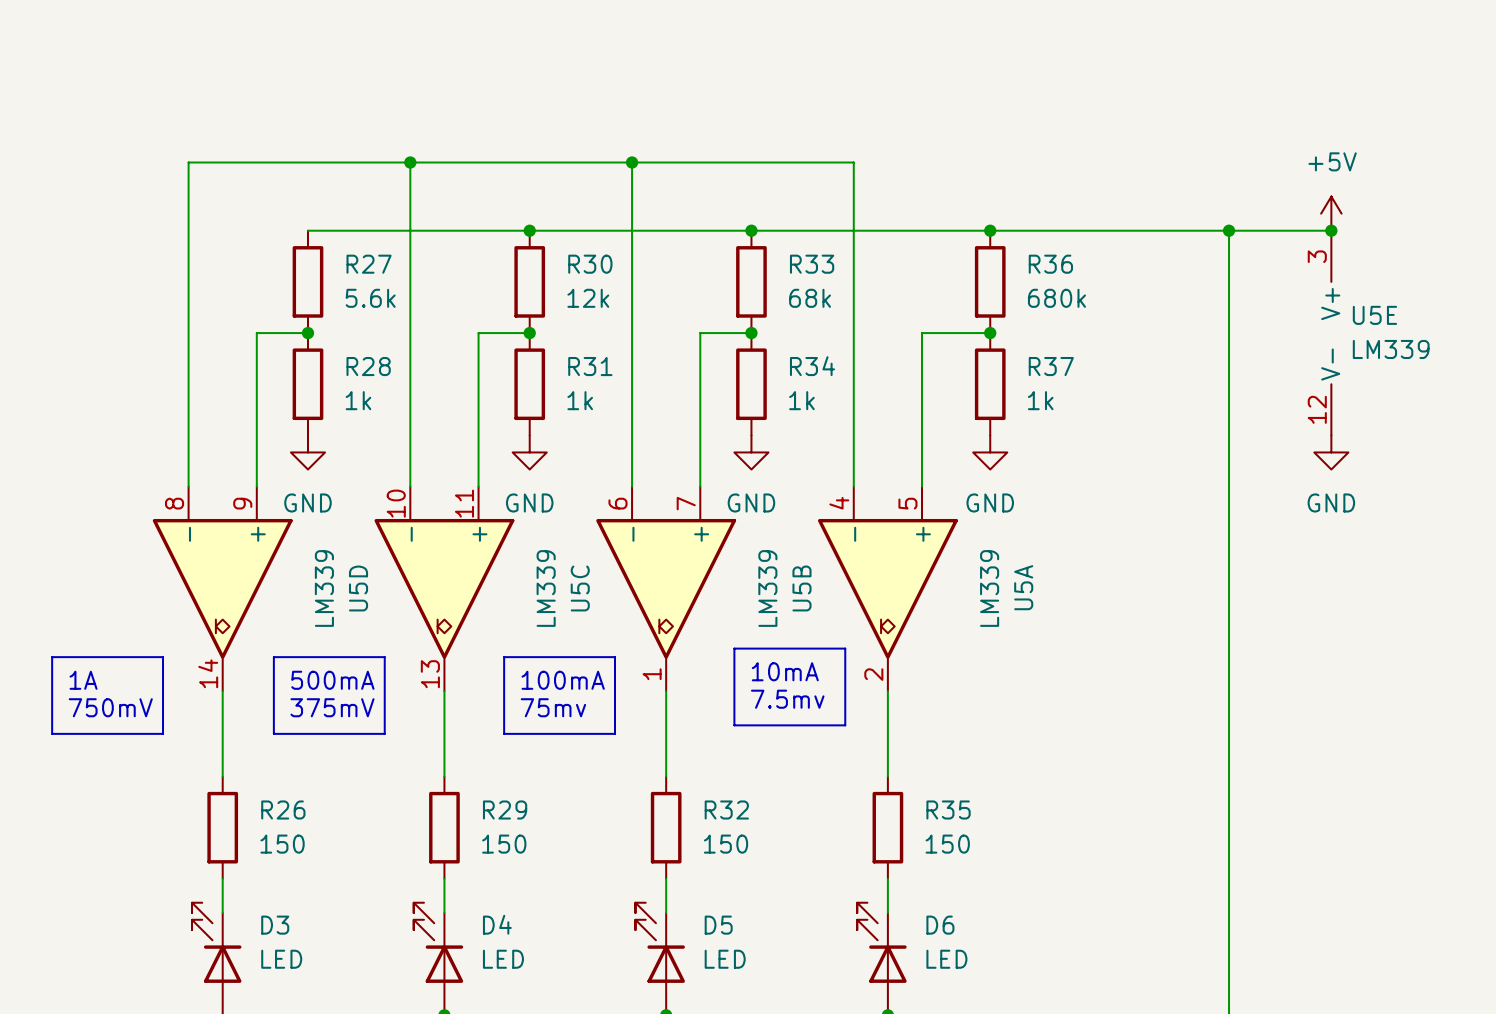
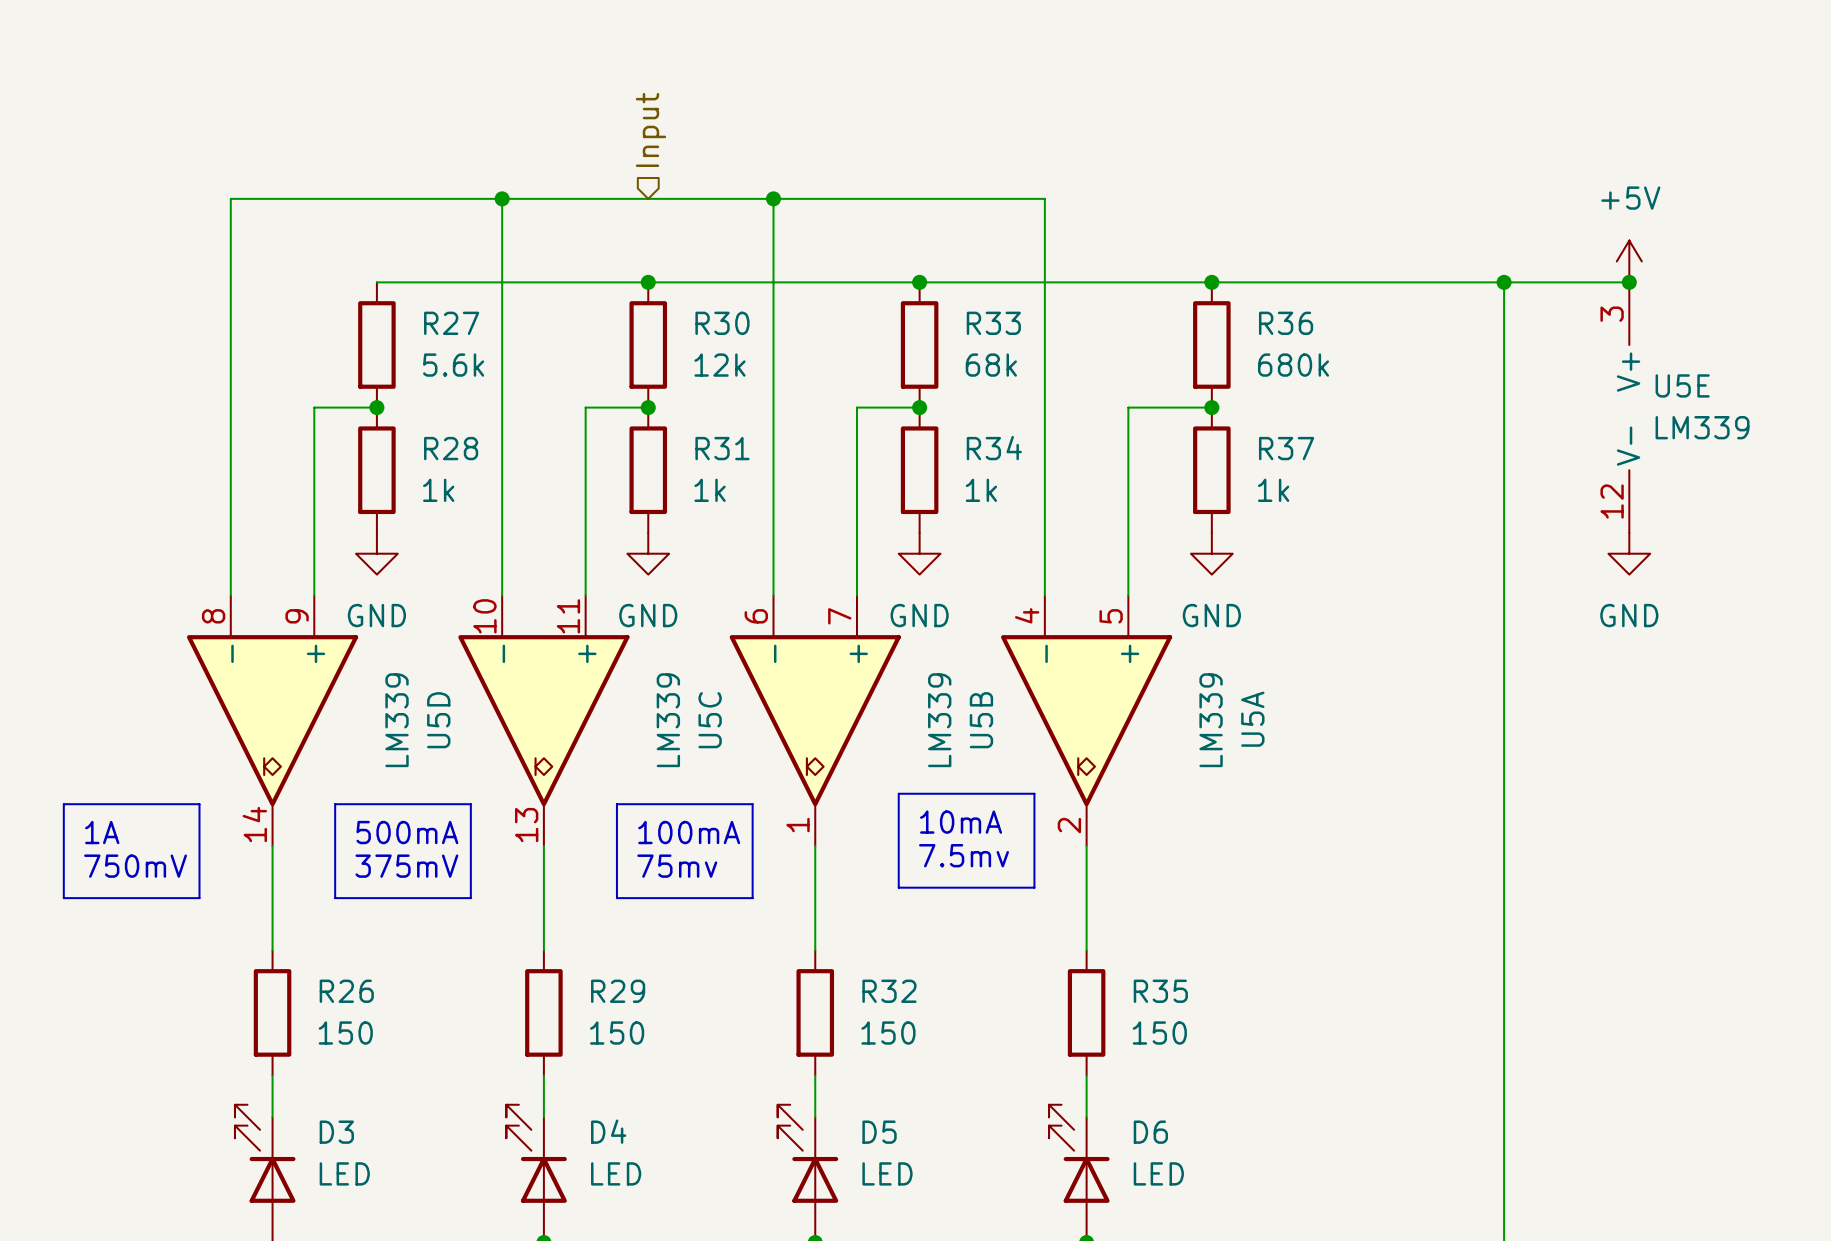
hierarchical label: none -> Input (650, 129)

